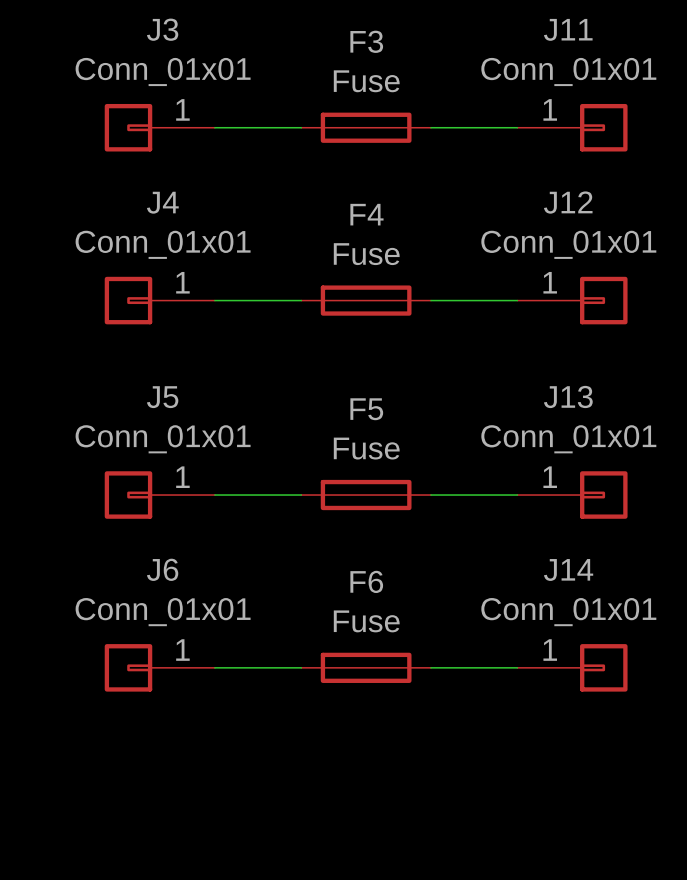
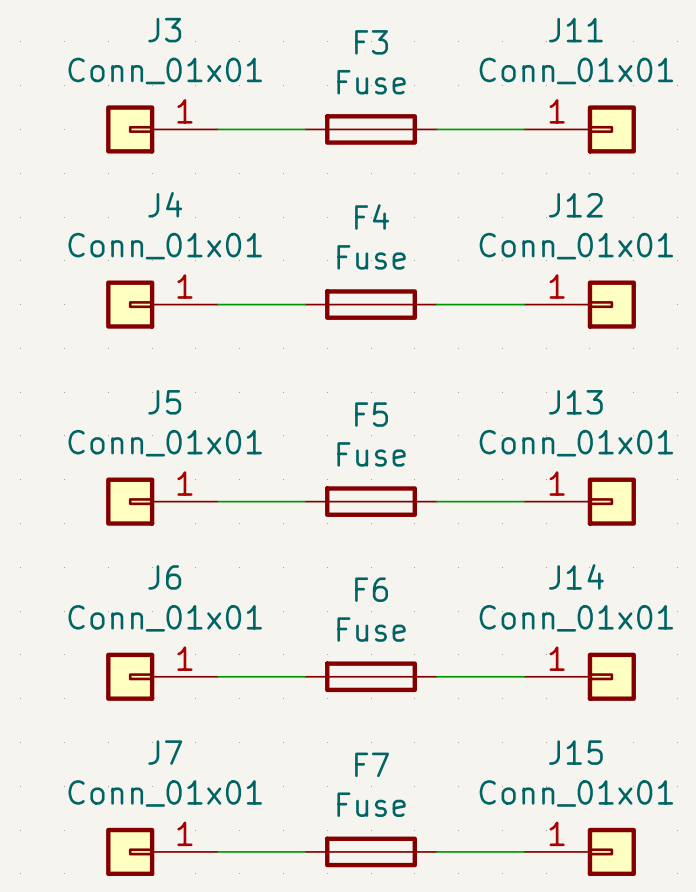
J7: none -> Conn_01x01 (161, 851)
wire: none -> (217, 851) (305, 851)
F7: none -> Fuse (371, 851)
wire: none -> (436, 851) (524, 851)
J15: none -> Conn_01x01 (580, 851)

